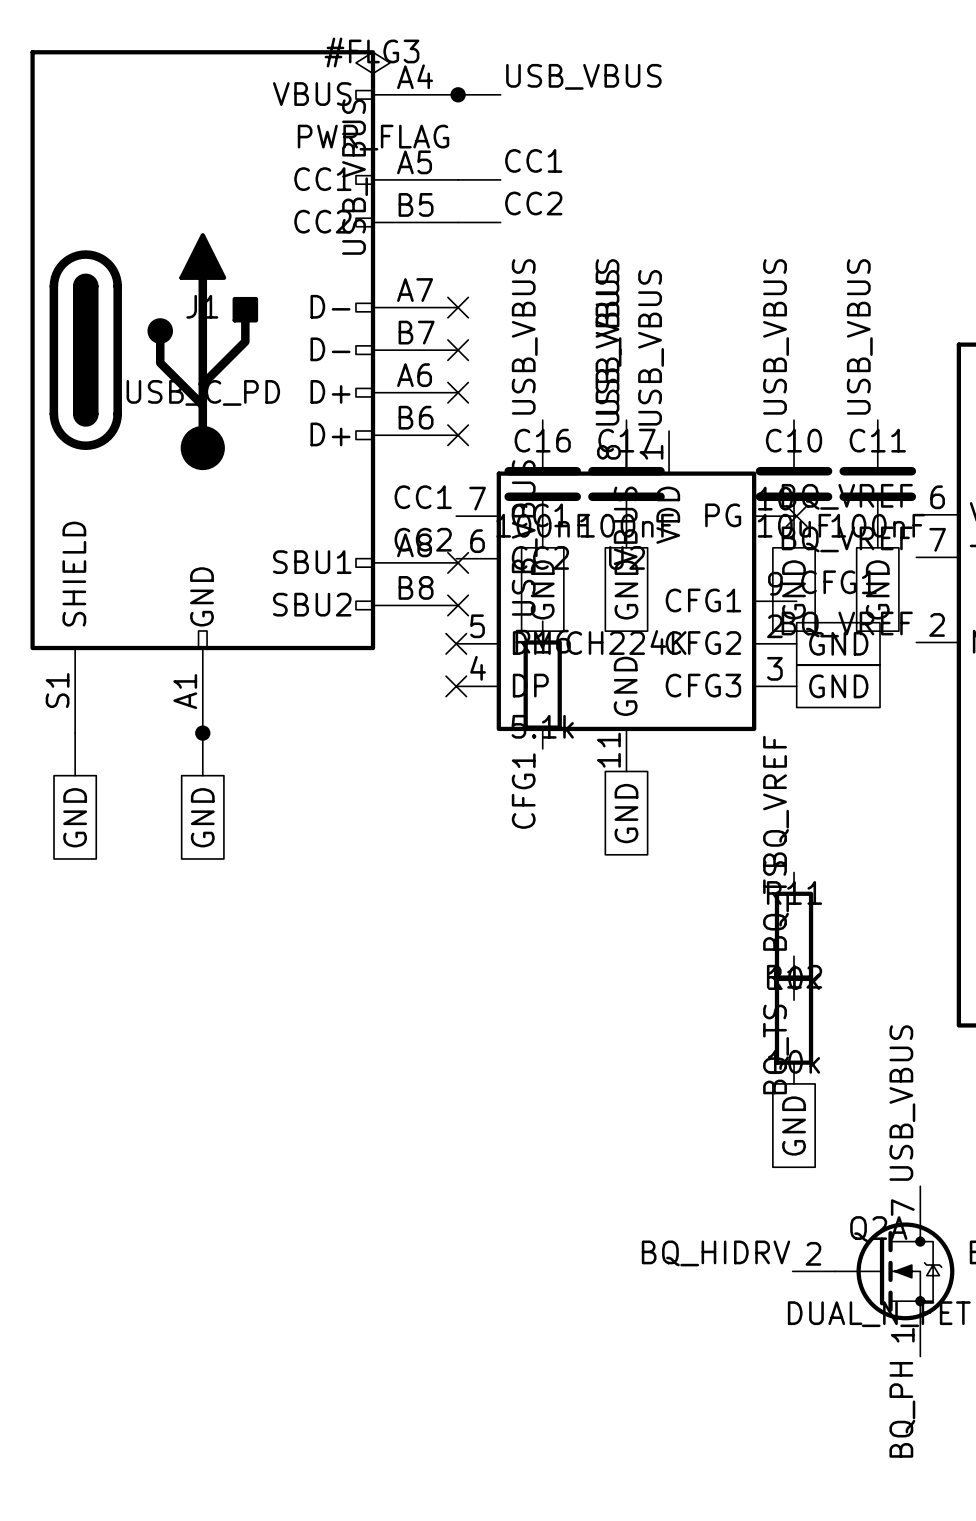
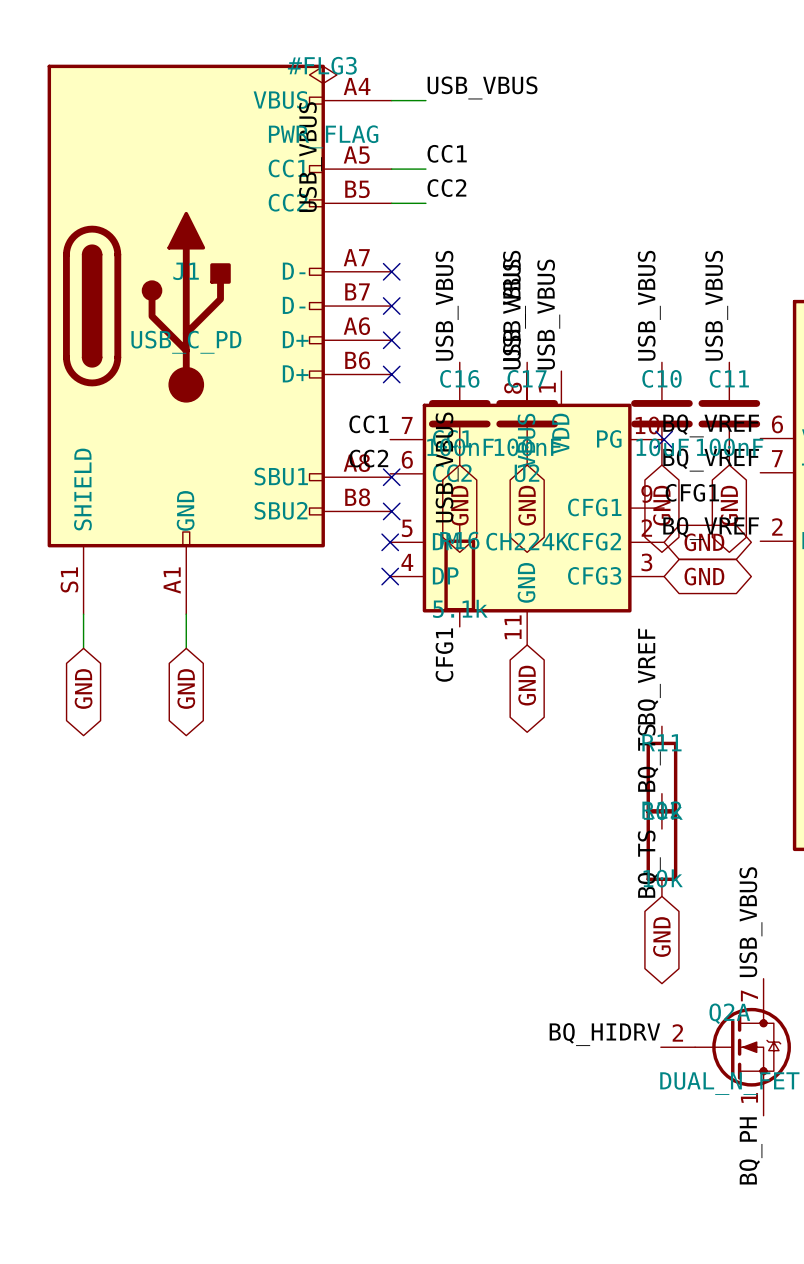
junction: (458, 94) -> none
global label shape: passive (542, 589) -> bidirectional (459, 505)
global label shape: passive (626, 589) -> bidirectional (527, 505)
global label shape: passive (794, 589) -> bidirectional (661, 505)
global label shape: passive (877, 589) -> bidirectional (729, 505)
global label shape: passive (838, 643) -> bidirectional (704, 542)
global label shape: passive (838, 686) -> bidirectional (704, 576)
junction: (202, 733) -> none
global label shape: passive (626, 813) -> bidirectional (527, 685)
global label shape: passive (75, 817) -> bidirectional (83, 689)
global label shape: passive (202, 817) -> bidirectional (186, 689)
global label shape: passive (794, 1126) -> bidirectional (661, 937)

